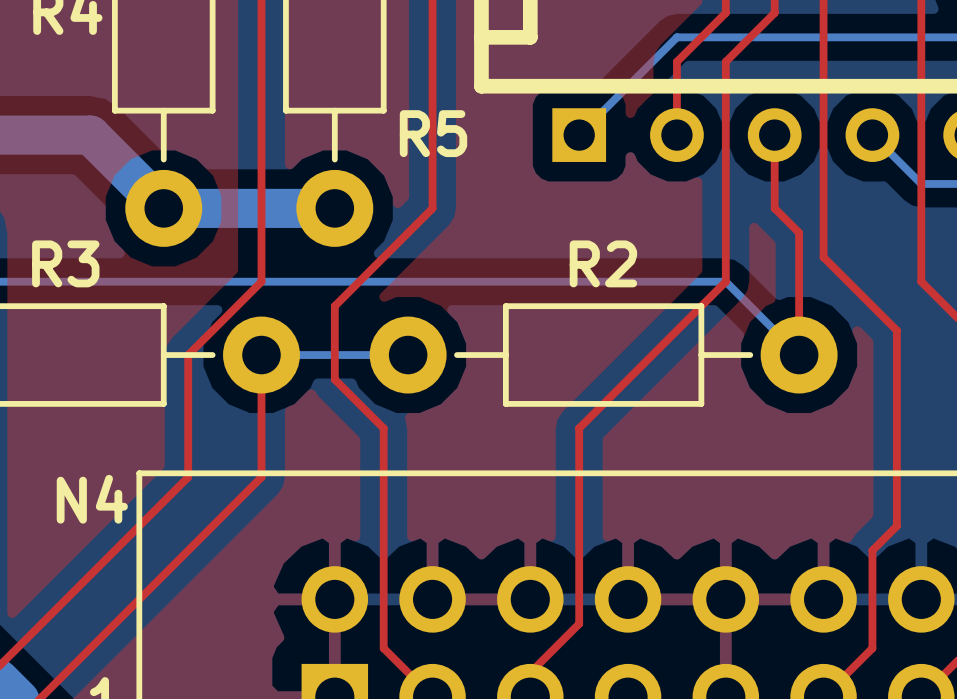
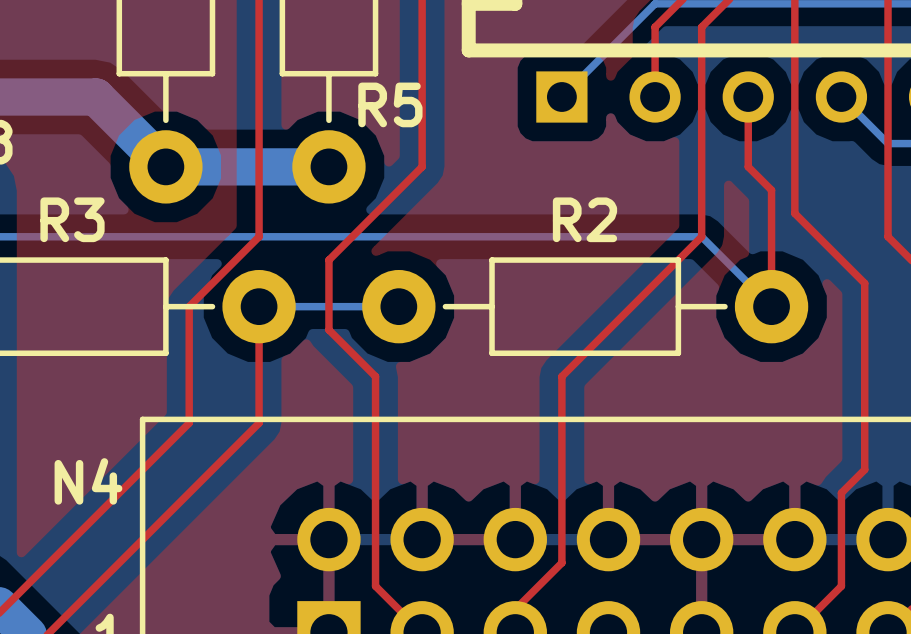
R5 name position: R5 (433, 133) -> R5 (390, 104)
N4 name position: N4 (92, 499) -> N4 (88, 481)

